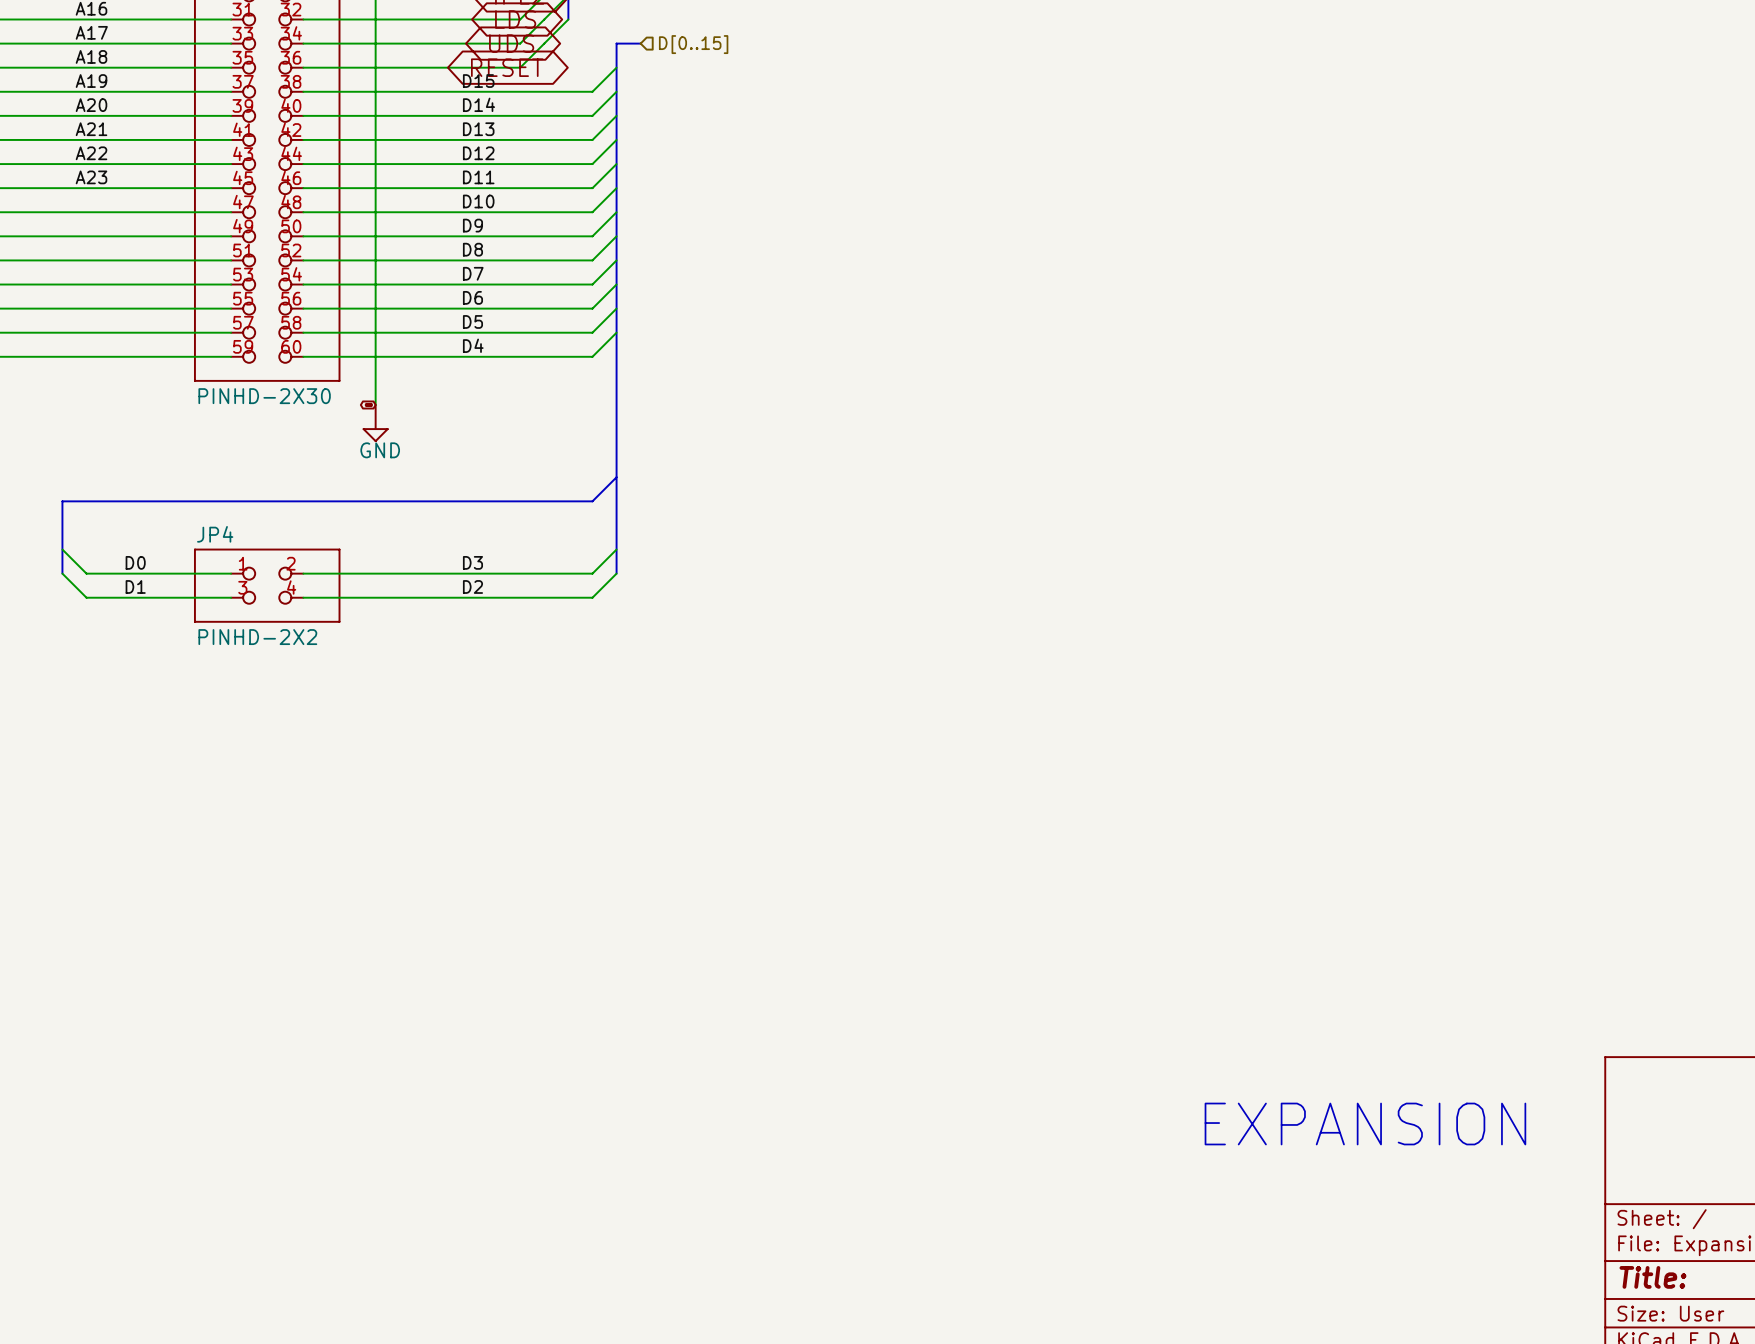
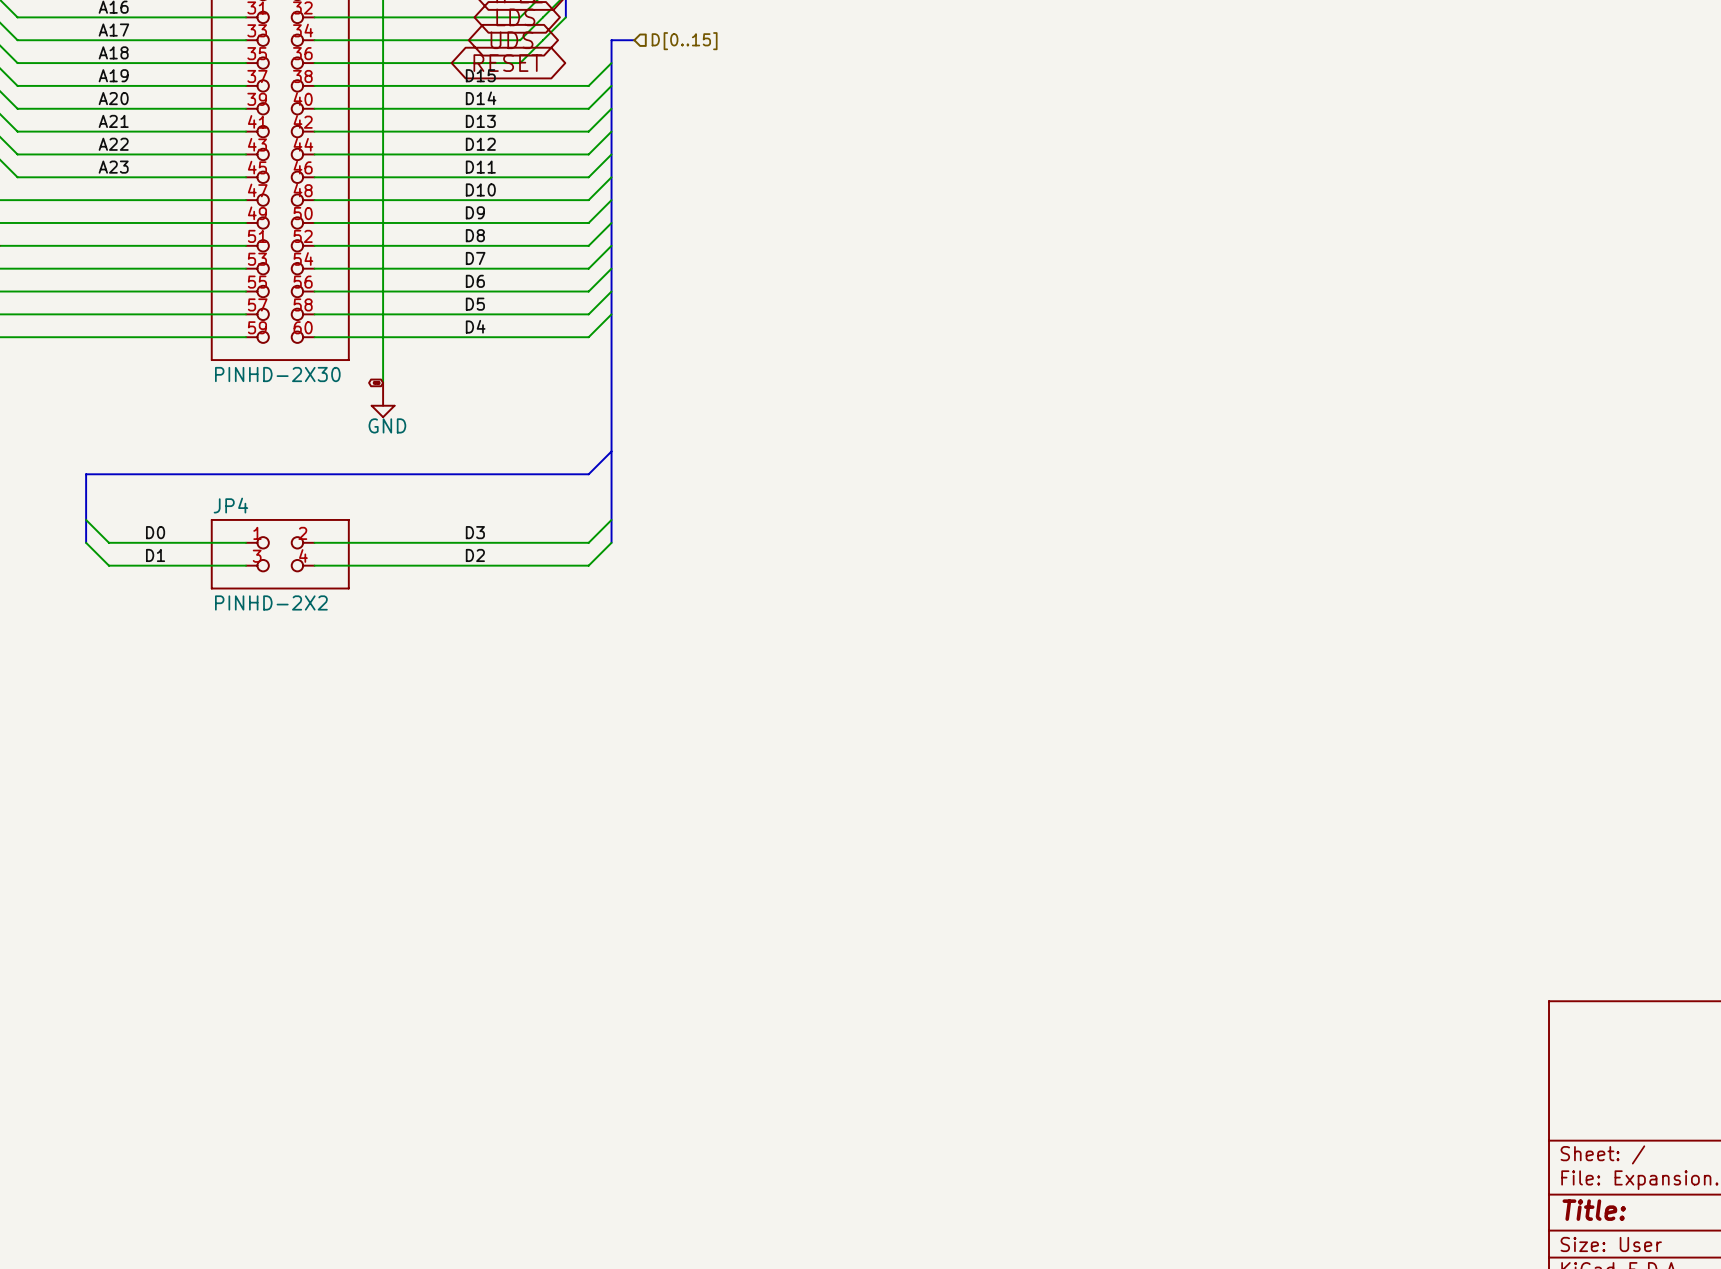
text: EXPANSION (1365, 1124) -> none

